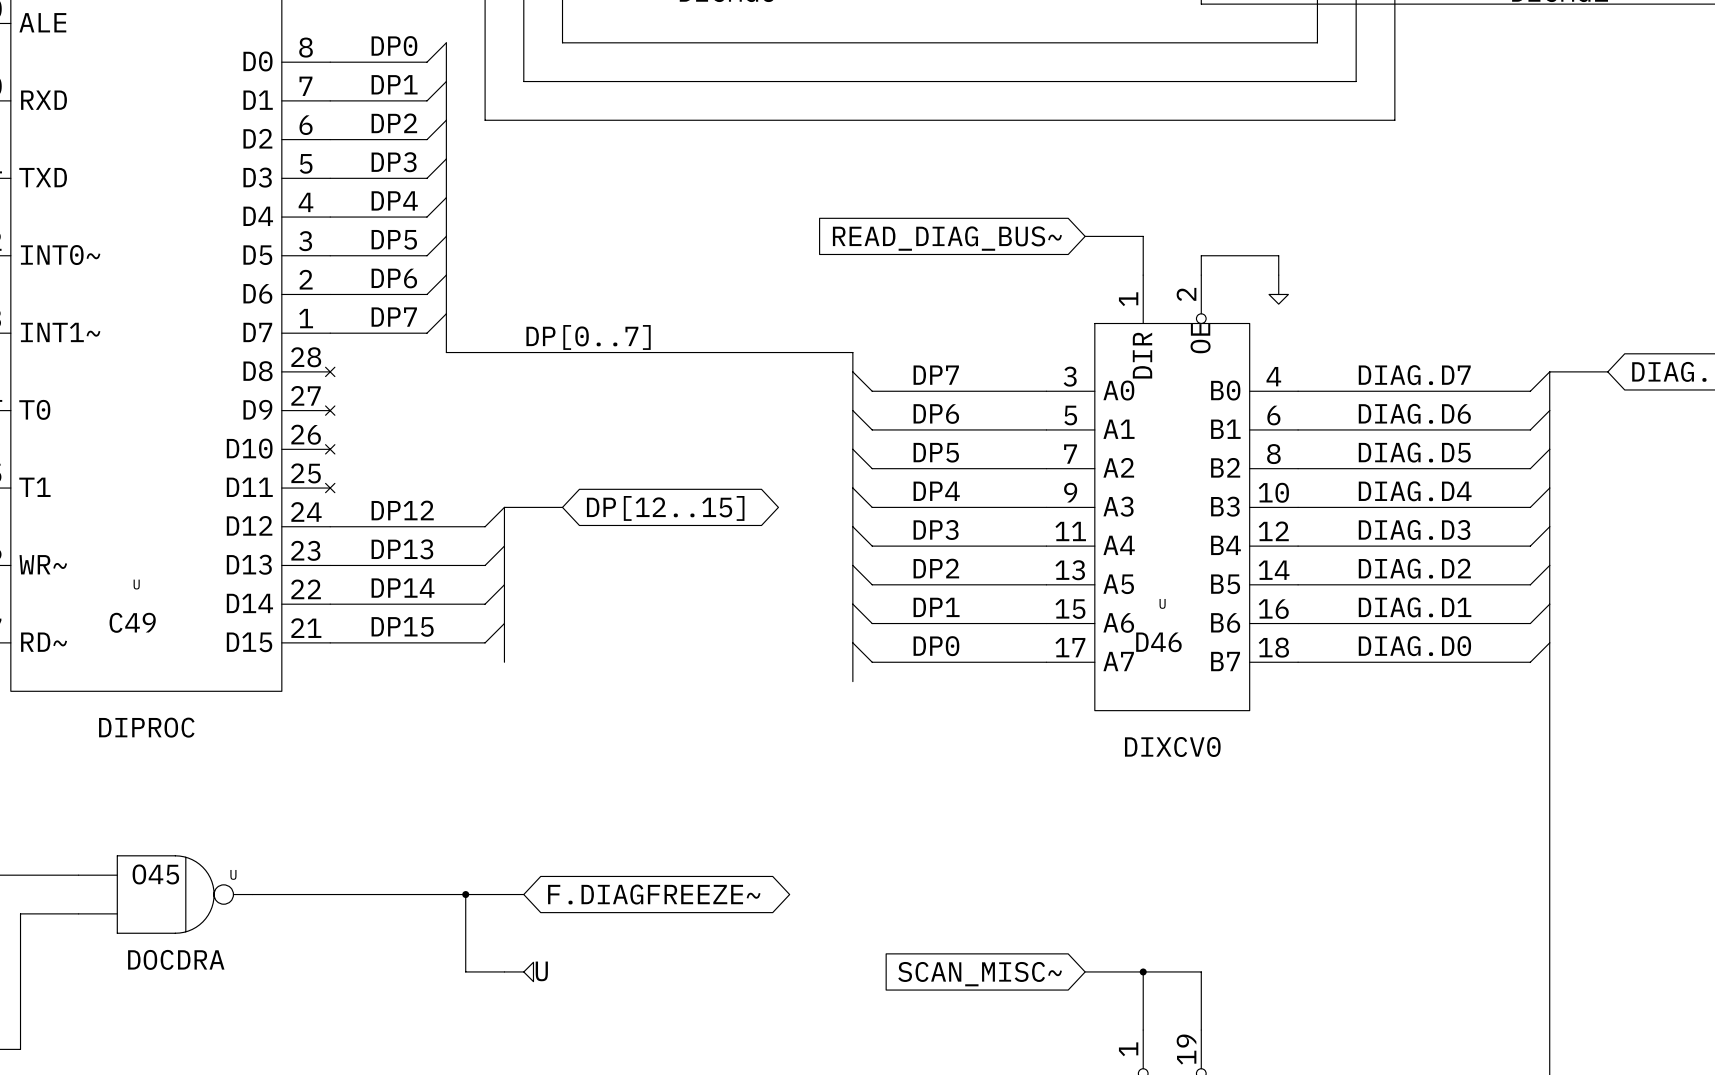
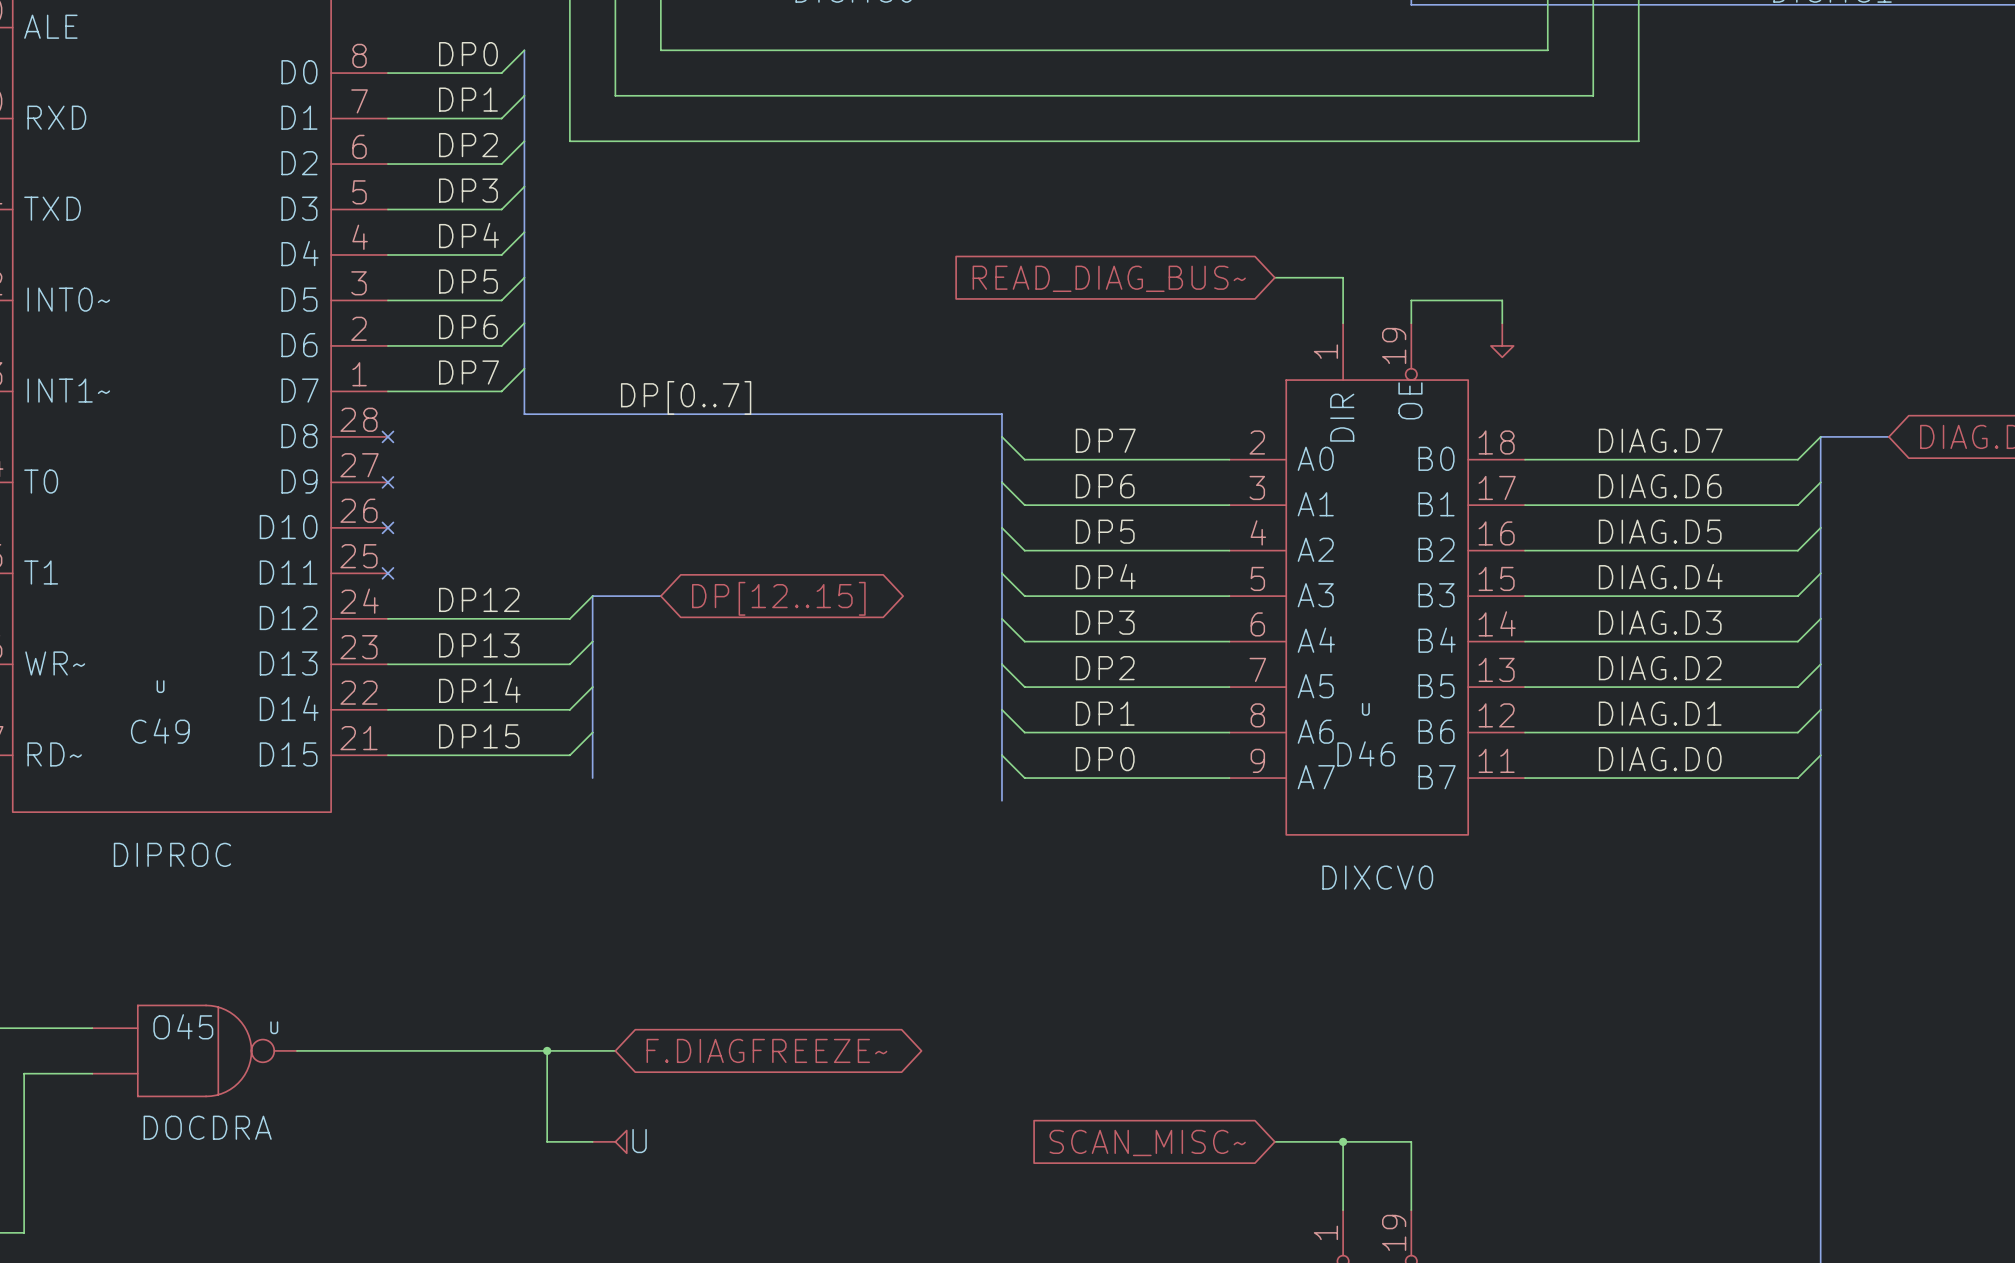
U symbol: [1046, 275, 1299, 711] -> [1229, 323, 1526, 835]

